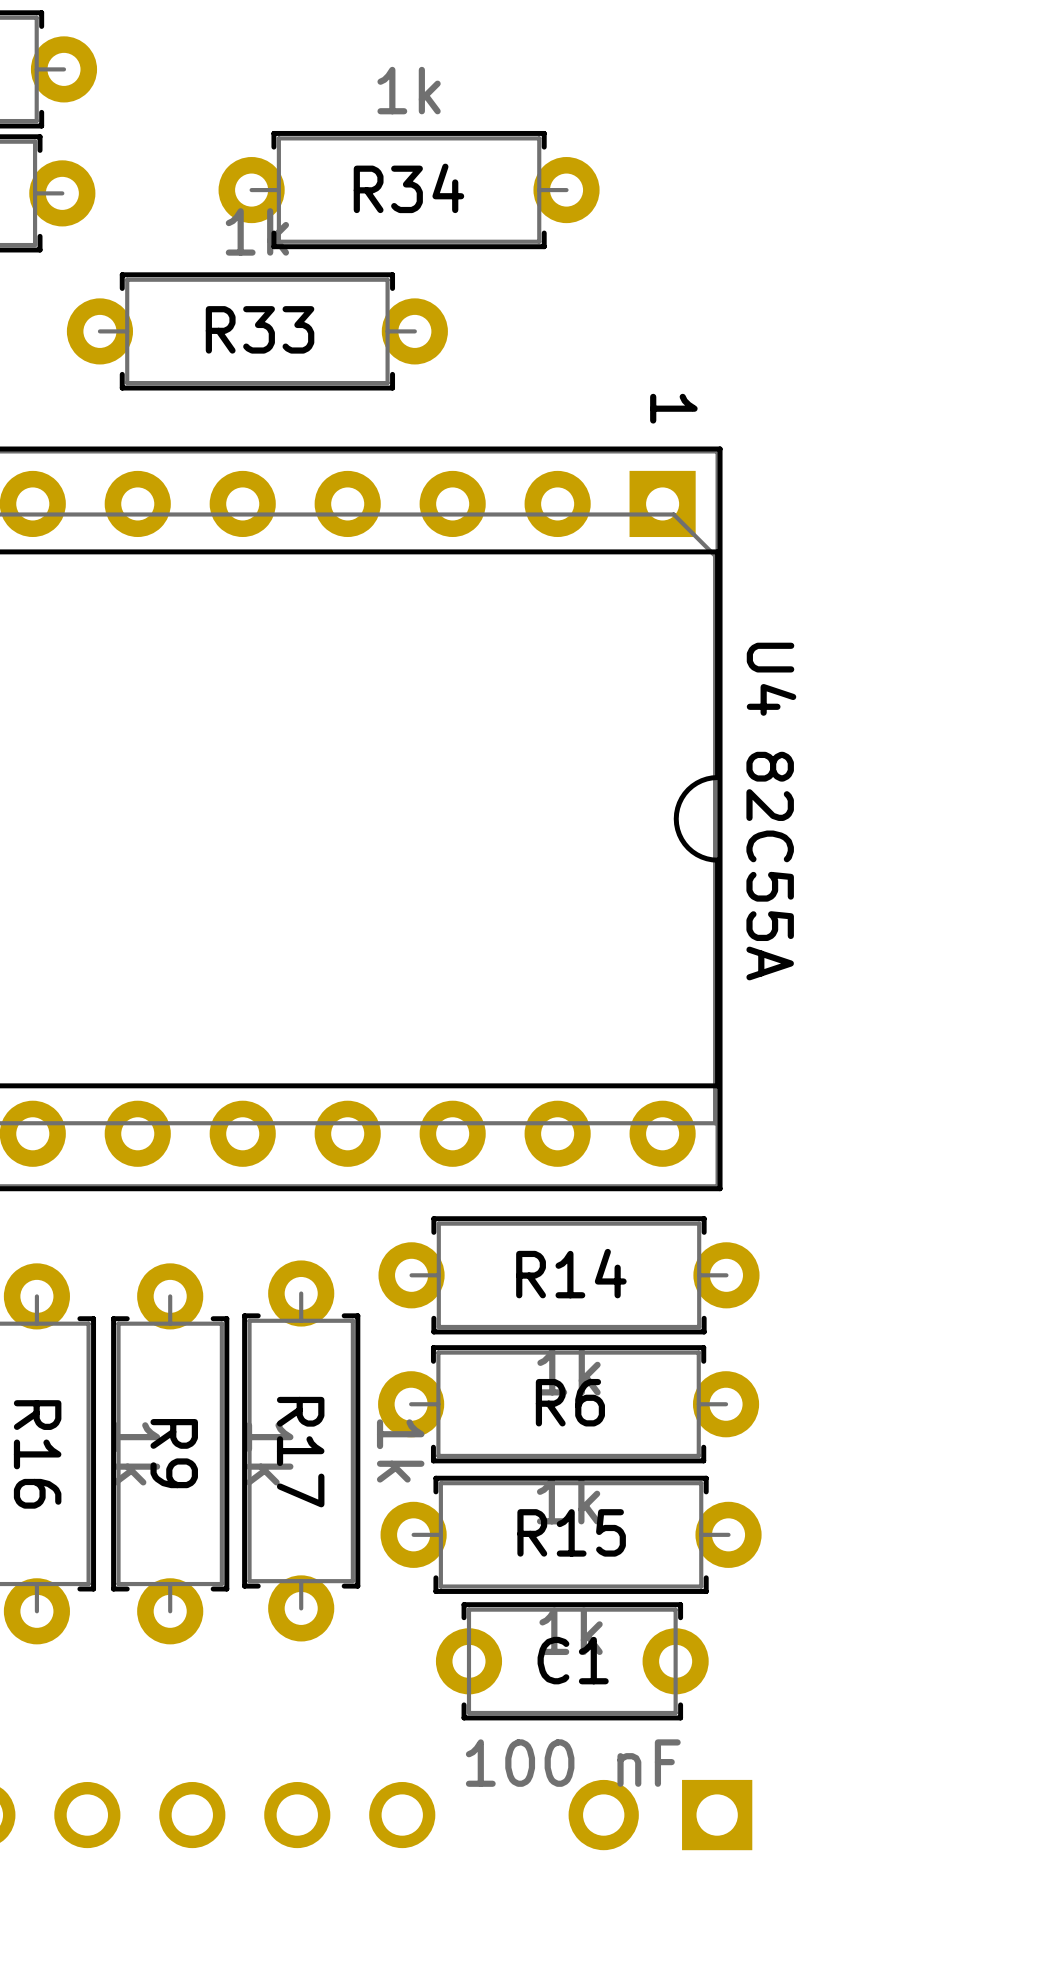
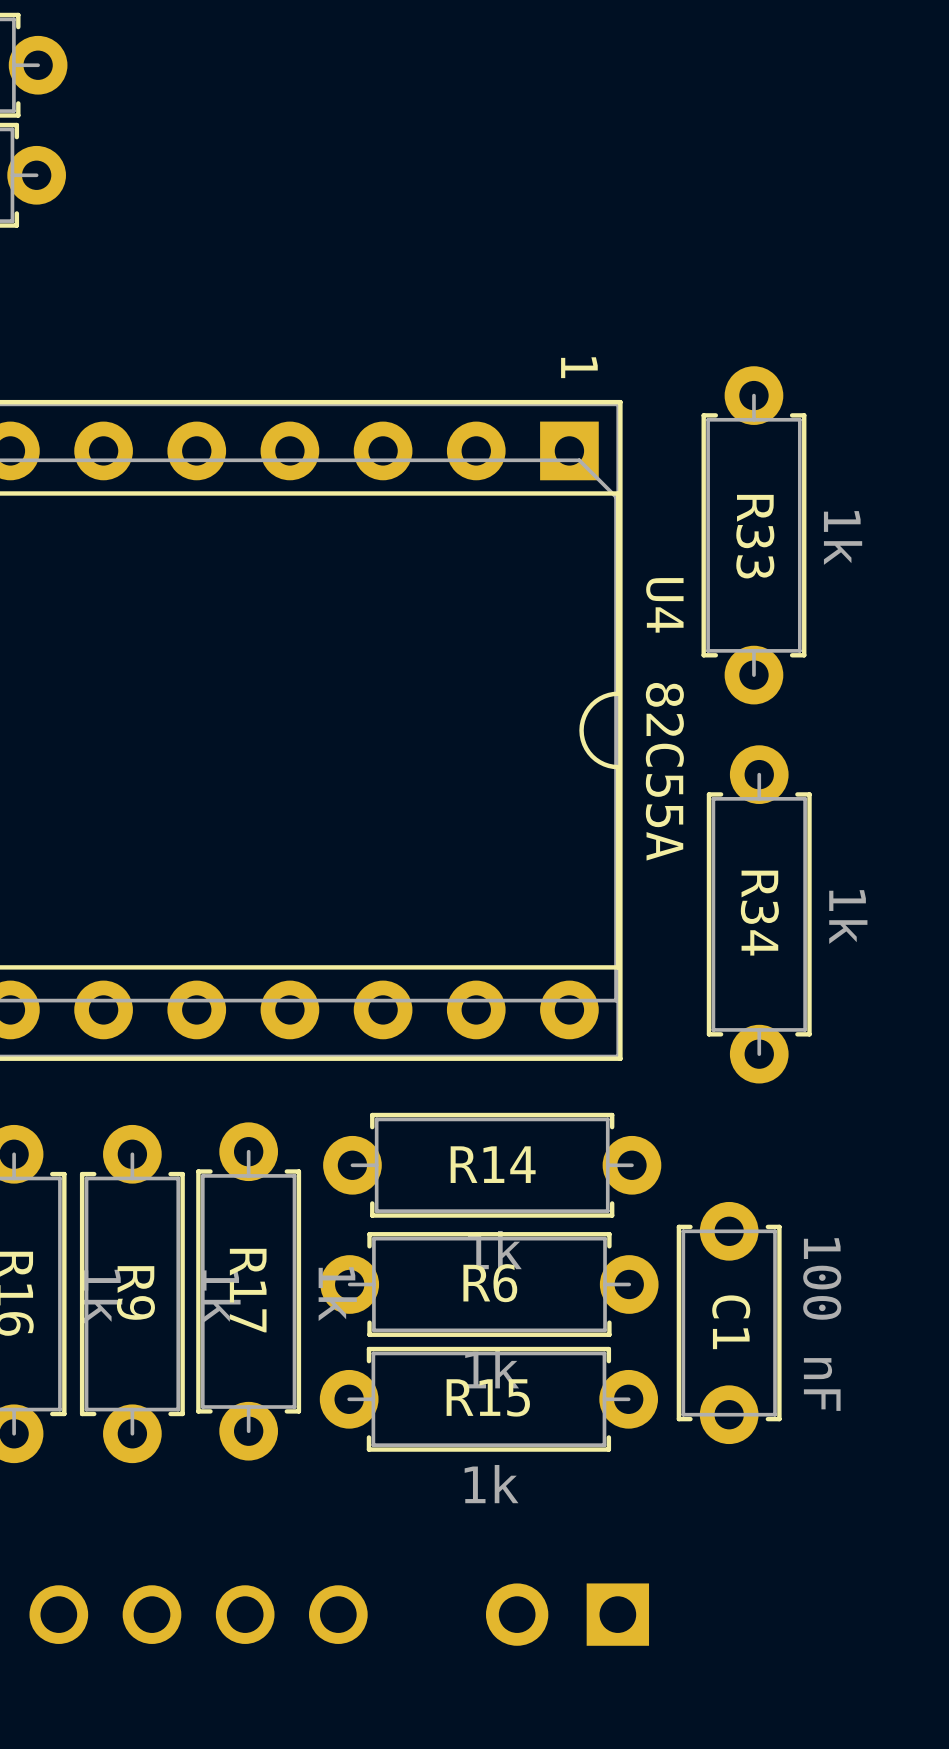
R34 rotation: 0° (409, 190) -> 90° clockwise (759, 914)
R34 position: (409, 190) -> (759, 914)
R33 rotation: 0° (257, 331) -> 90° clockwise (753, 535)
R33 position: (257, 331) -> (753, 535)
R14 position: (569, 1275) -> (492, 1165)
R6 position: (568, 1404) -> (489, 1284)
R15 position: (571, 1534) -> (488, 1399)
C1 rotation: 0° (572, 1661) -> 90° clockwise (729, 1323)
C1 position: (572, 1661) -> (729, 1323)
C1 value position: 100 nF (573, 1763) -> 100 nF (822, 1324)

